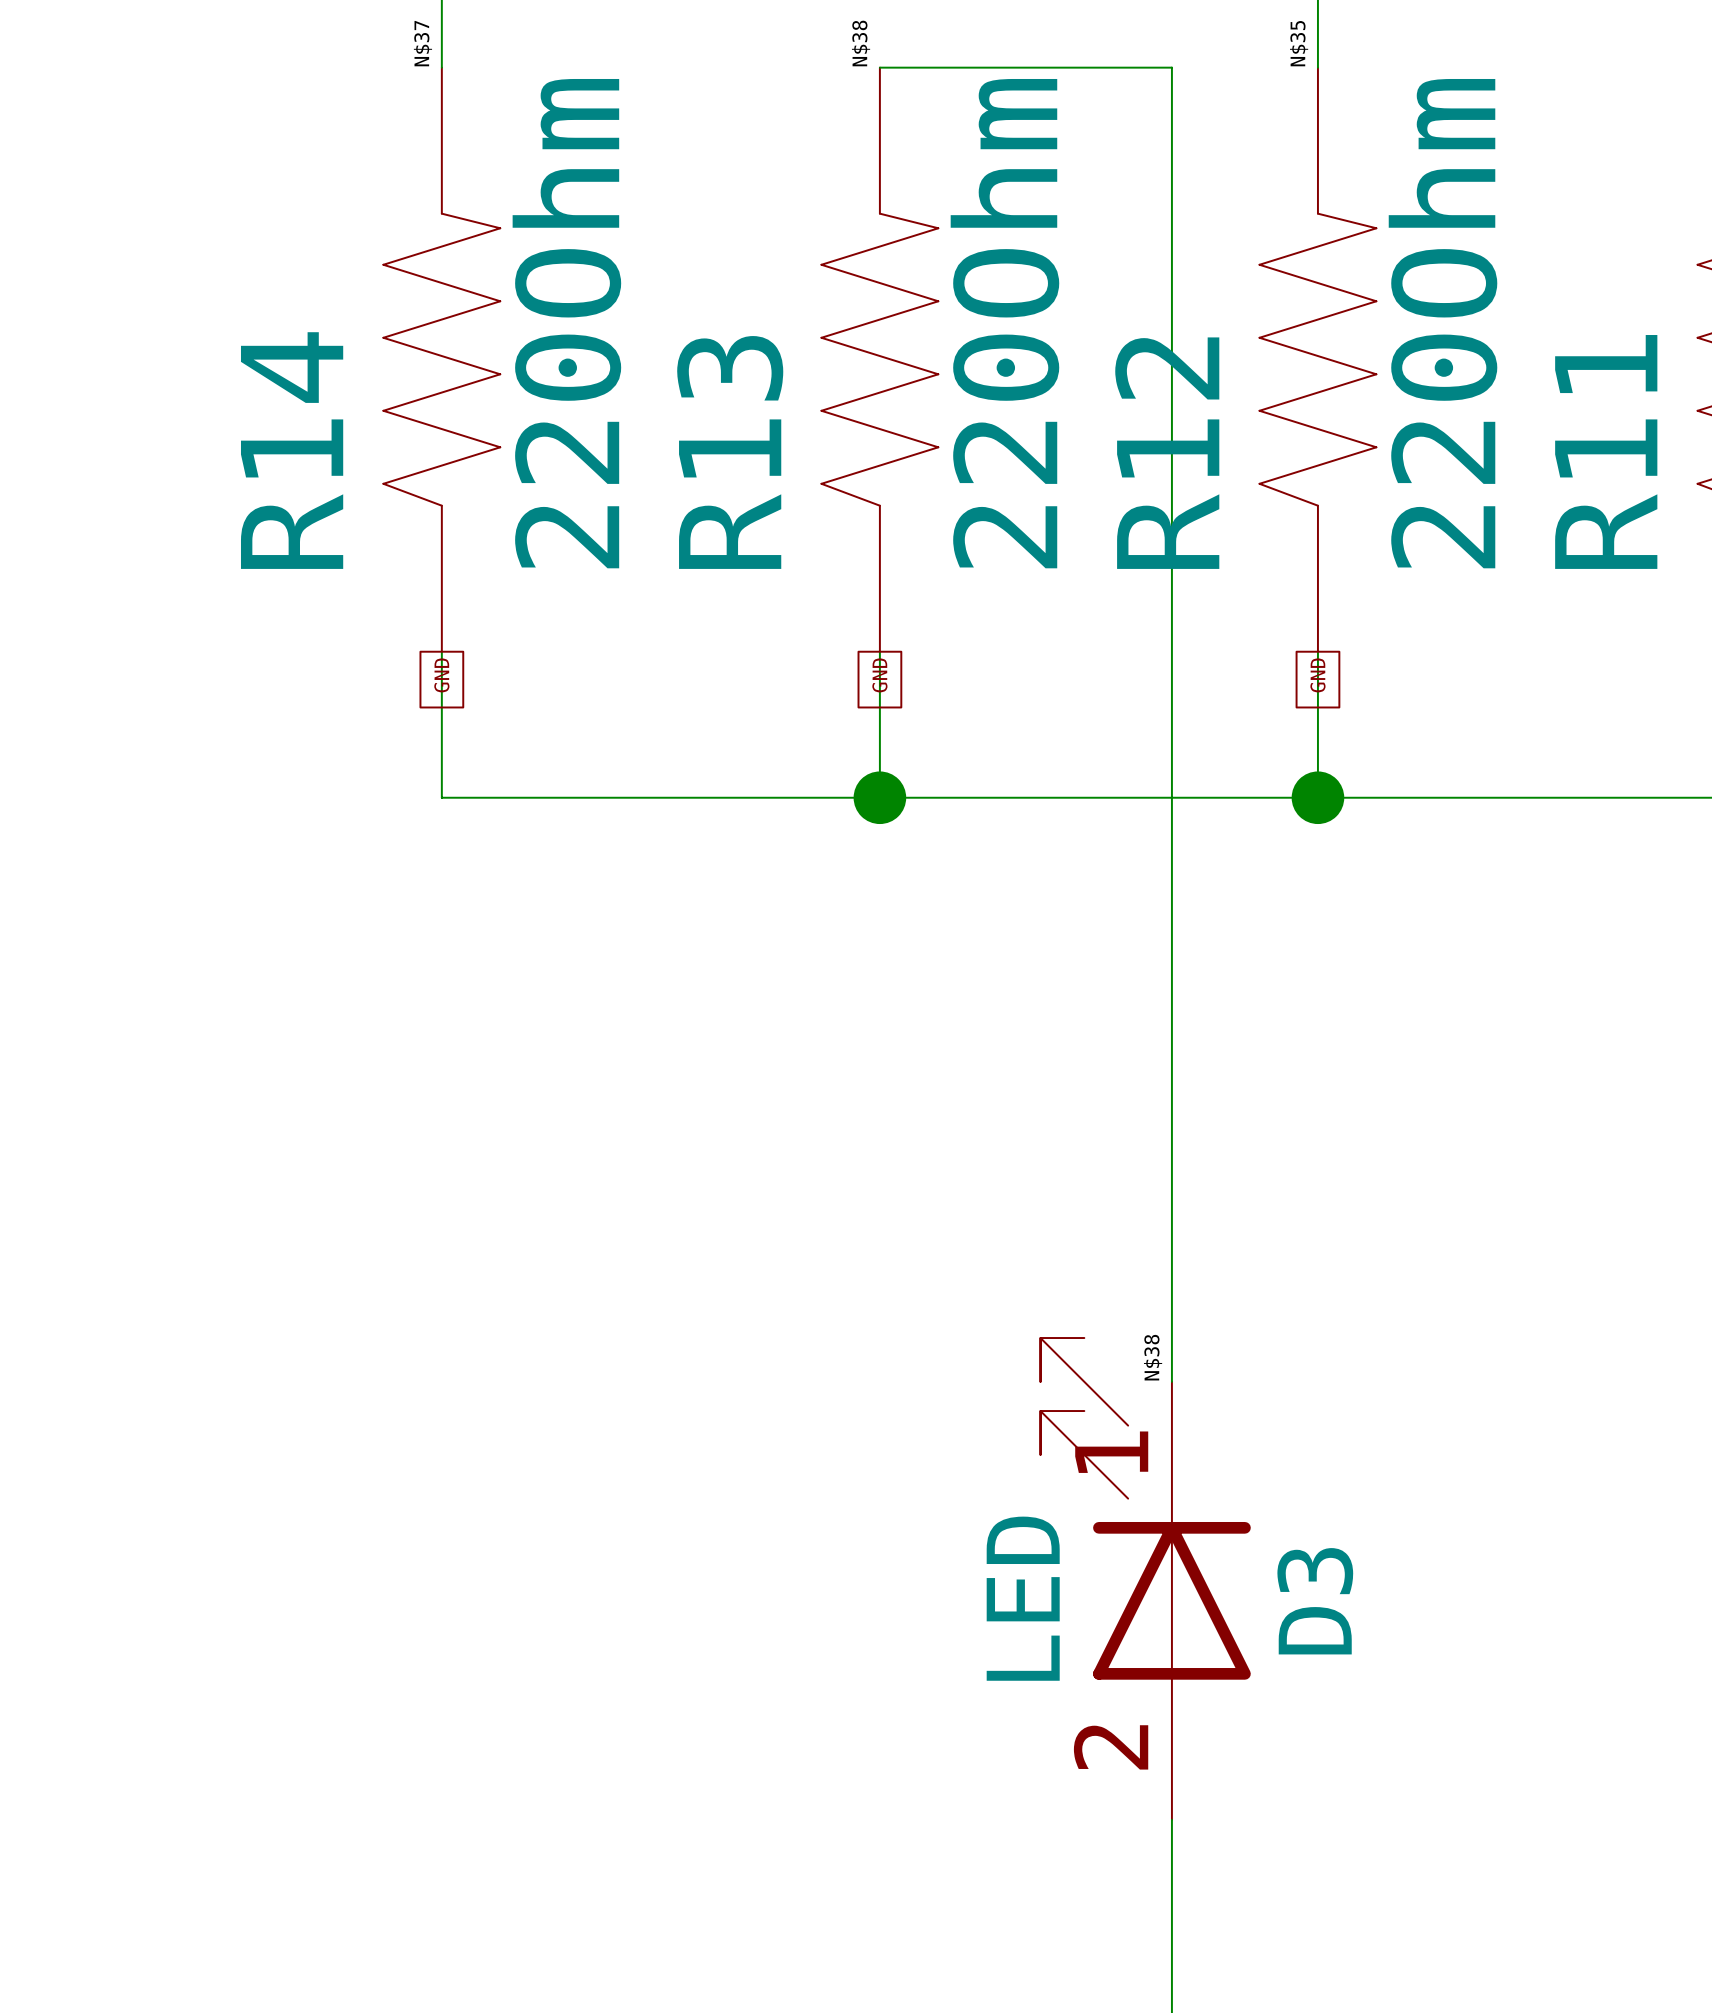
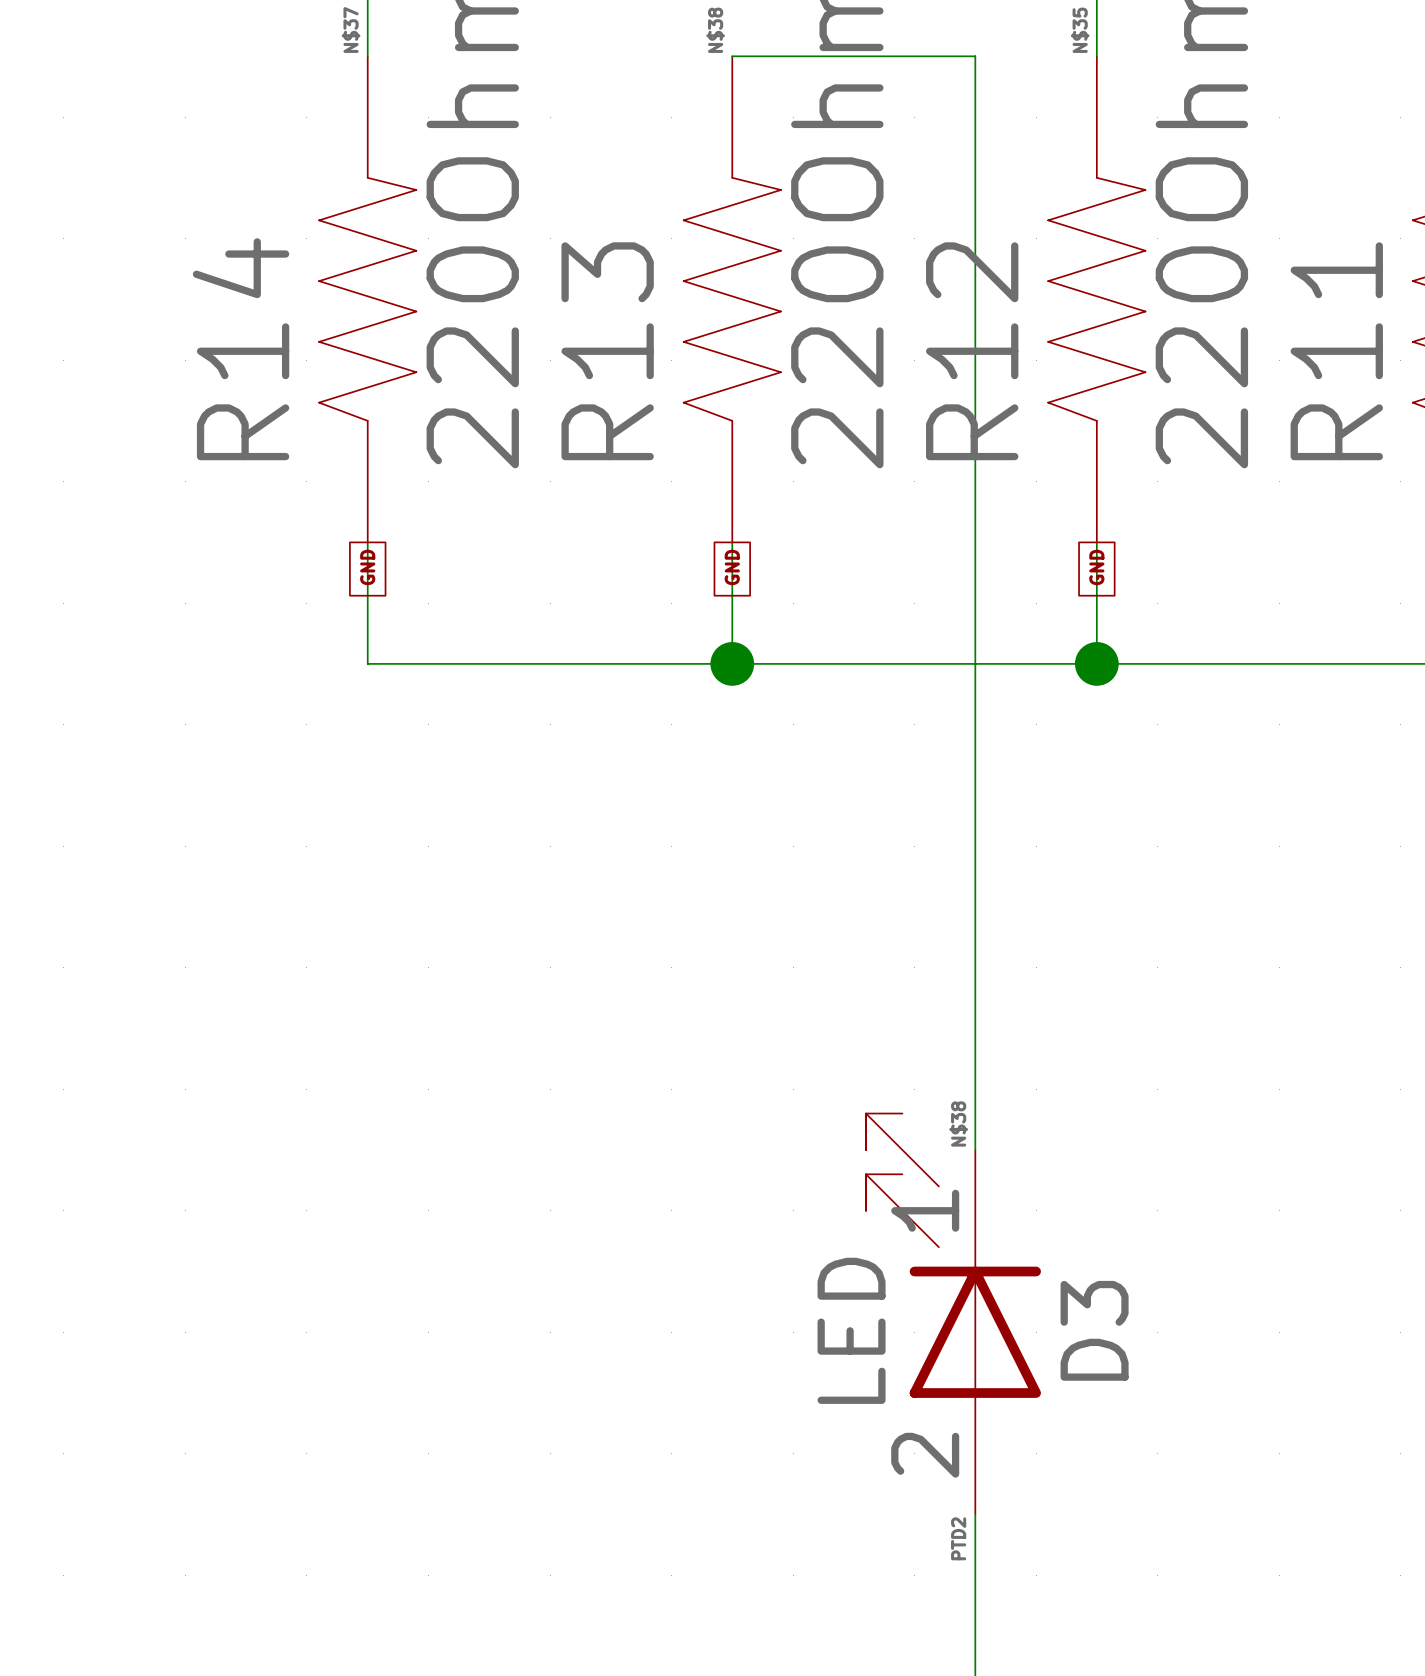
label: none -> PTD2 (958, 1538)

